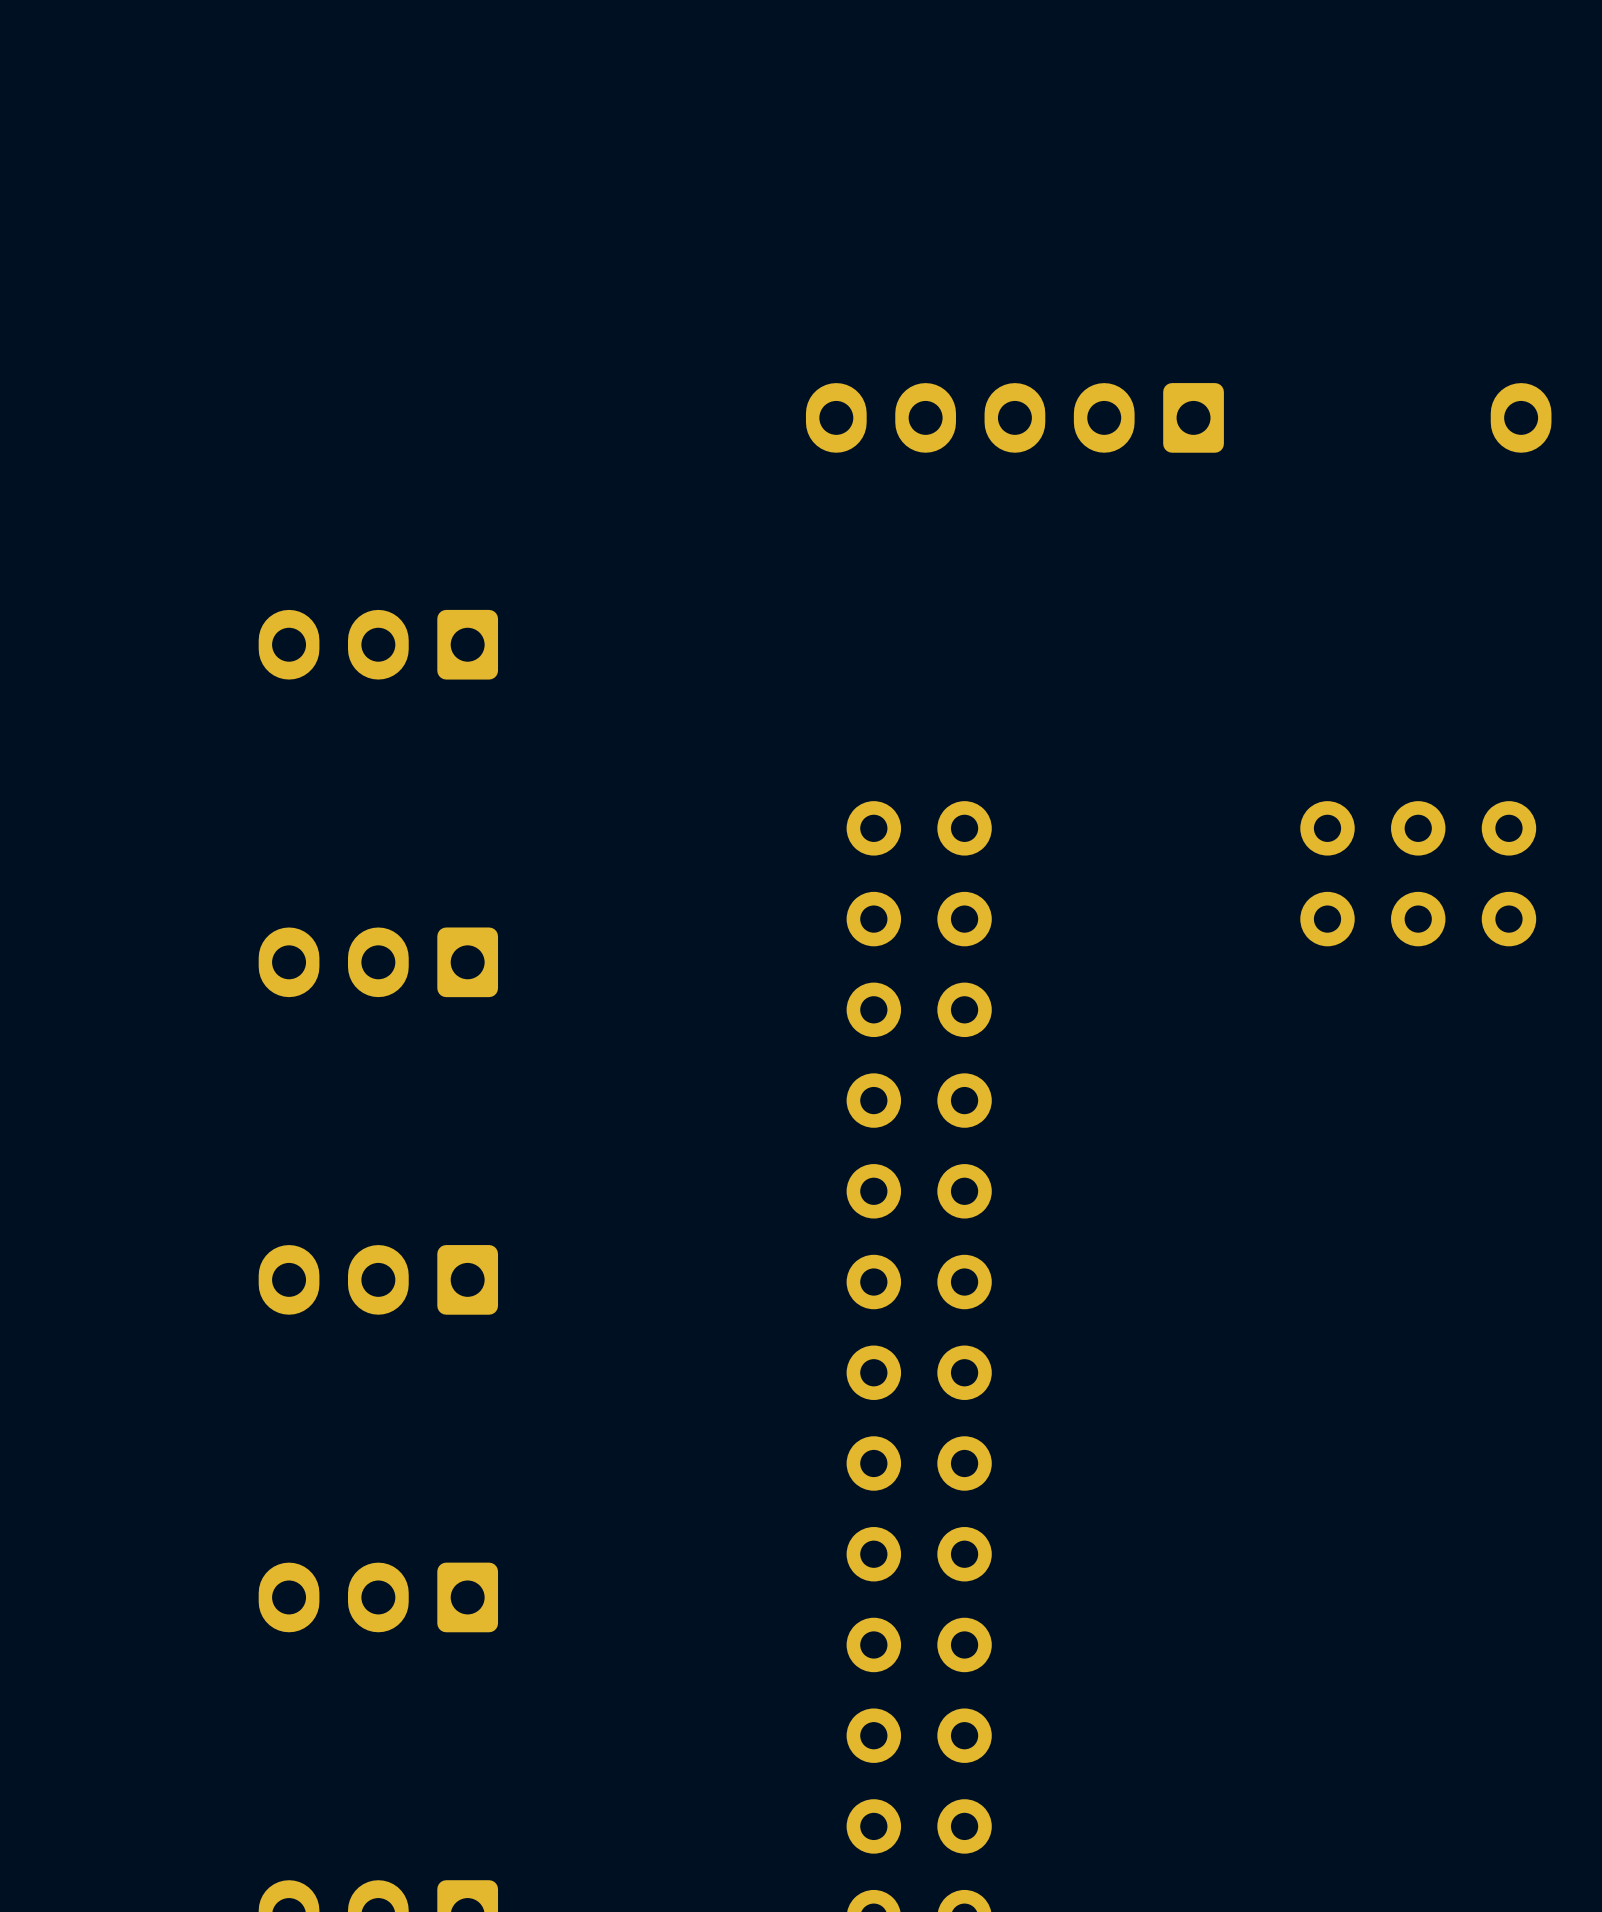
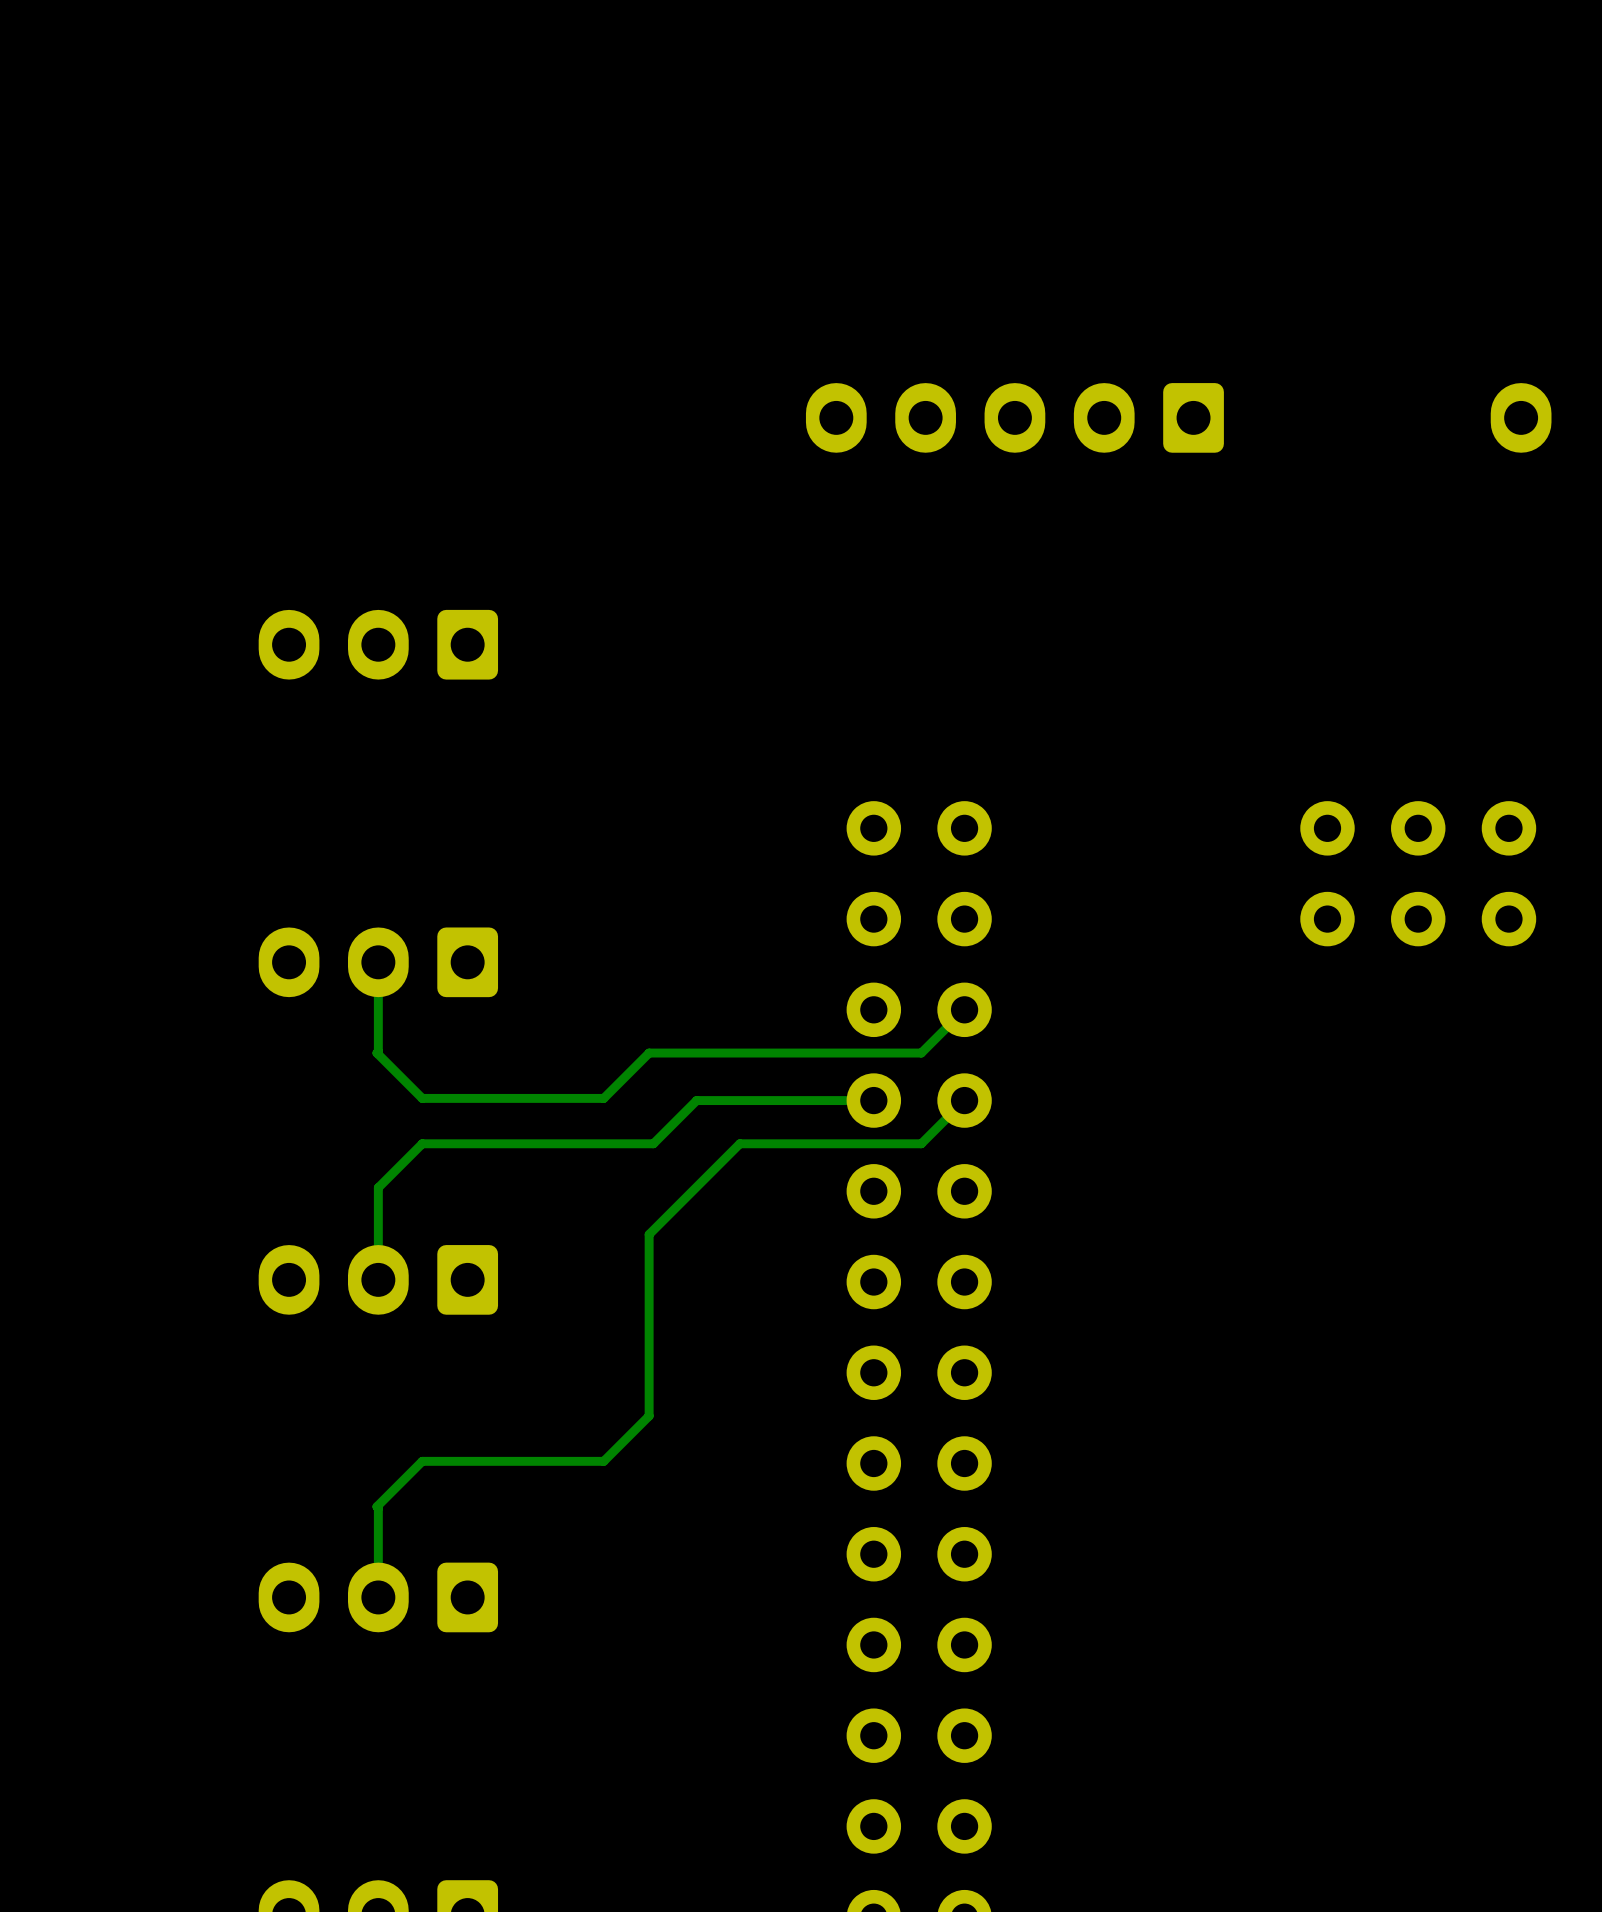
track: none -> (378, 962) (376, 1053) (422, 1098) (603, 1098) (649, 1053) (921, 1053) (964, 1009)
track: none -> (873, 1100) (696, 1100) (653, 1143) (422, 1143) (378, 1187) (378, 1279)
track: none -> (964, 1100) (921, 1143) (739, 1143) (649, 1234) (649, 1415) (603, 1461) (422, 1461) (376, 1506) (378, 1597)

